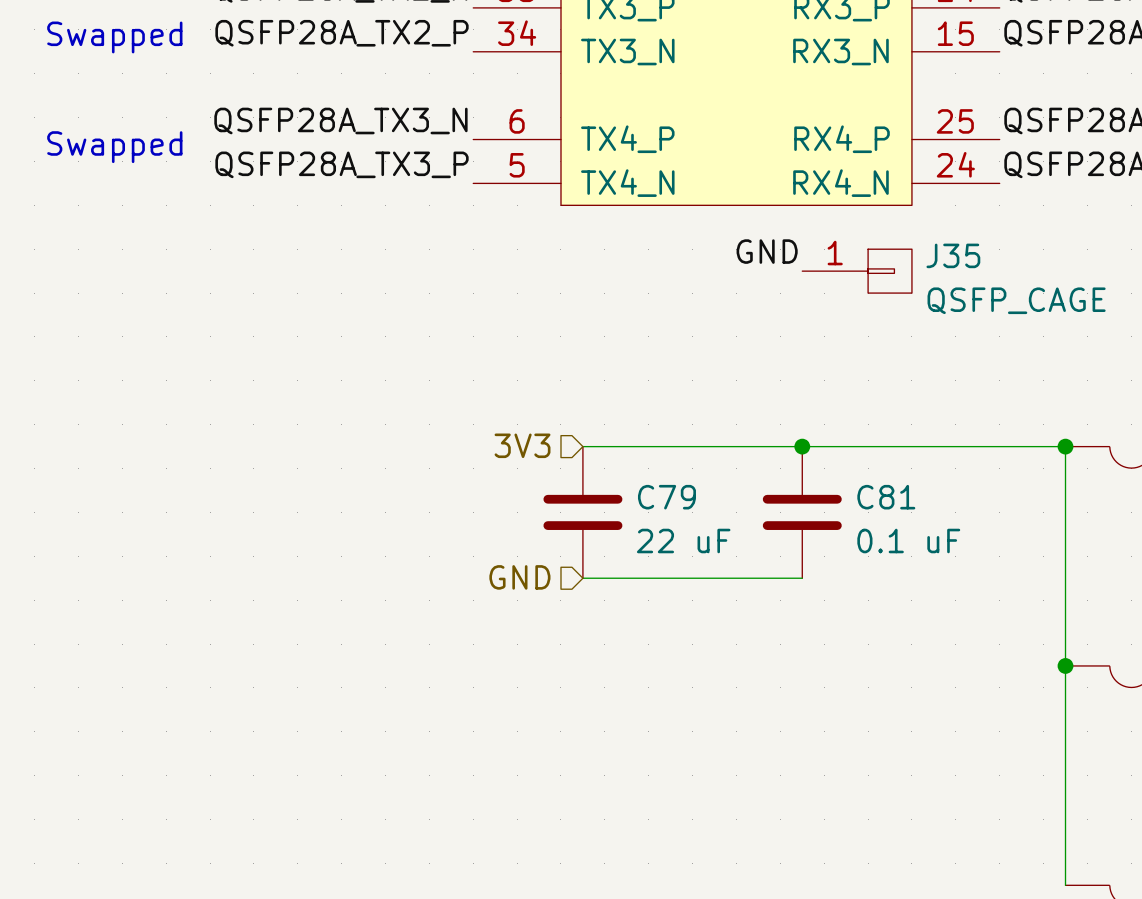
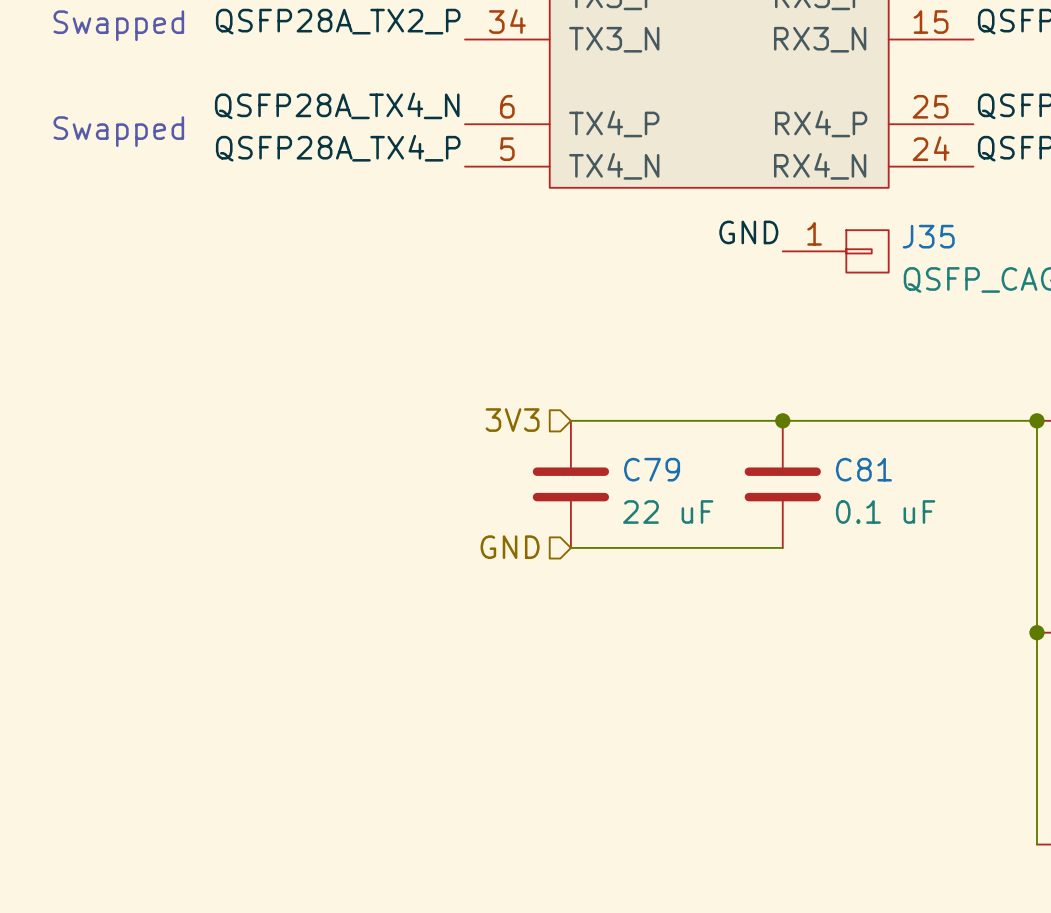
label: QSFP28A_TX3_N (340, 120) -> QSFP28A_TX4_N (337, 105)
label: QSFP28A_TX3_P (342, 164) -> QSFP28A_TX4_P (338, 148)

